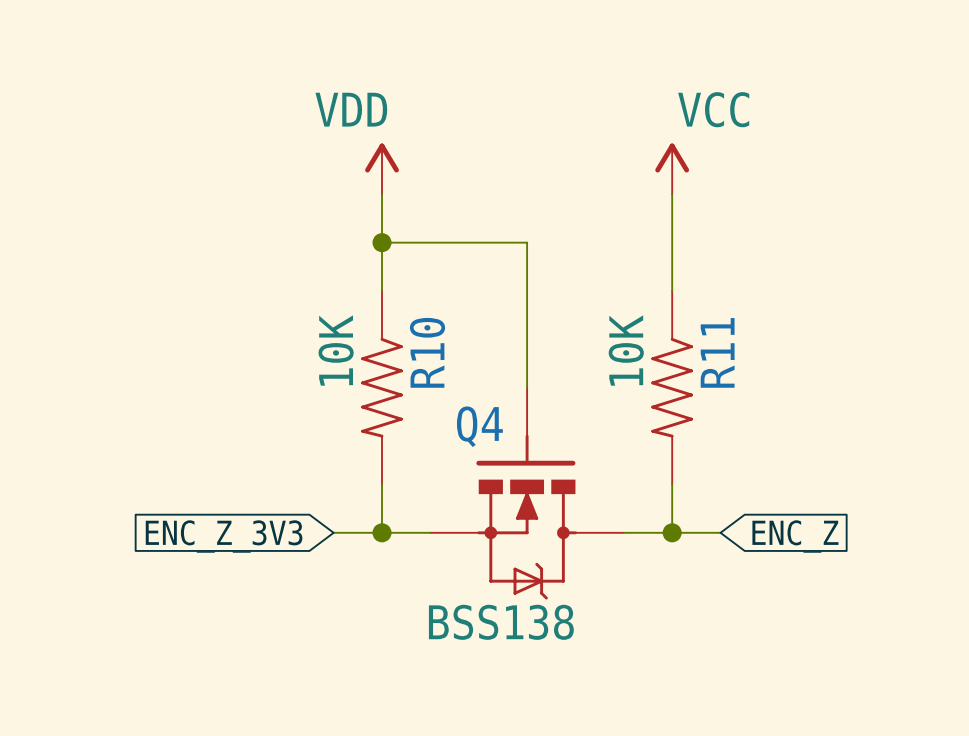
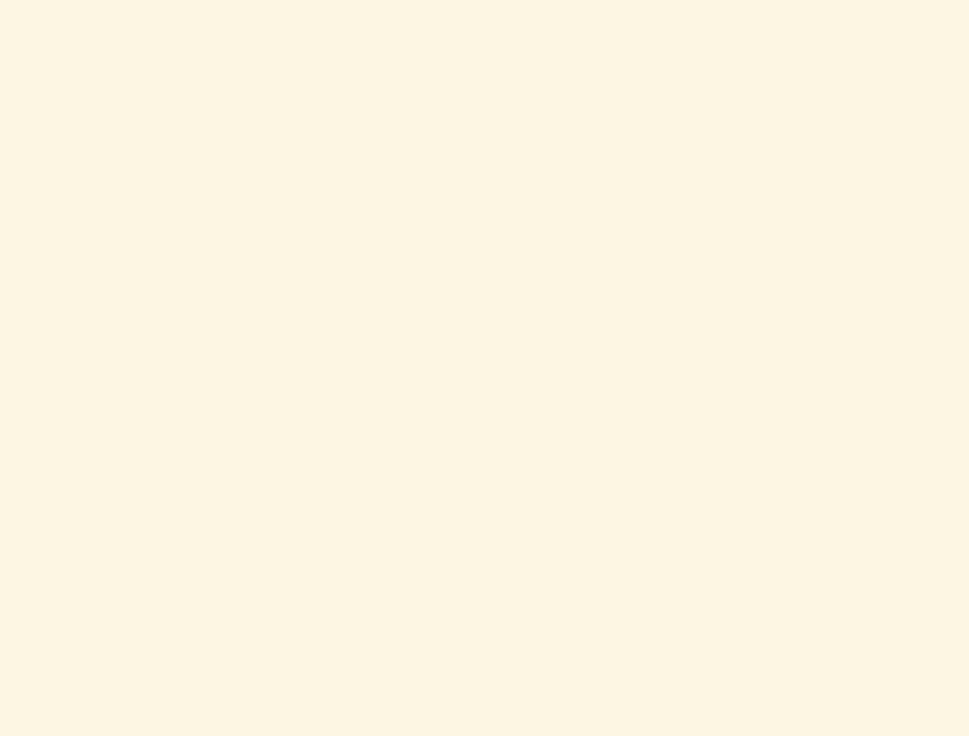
power symbol: VDD (382, 168) -> none
power symbol: VCC (672, 168) -> none
wire: (382, 194) (382, 291) -> none
wire: (672, 194) (672, 291) -> none
wire: (382, 242) (527, 242) (527, 387) -> none
junction: (382, 242) -> none
R10: 10K (382, 387) -> none
R11: 10K (672, 387) -> none
wire: (382, 484) (382, 532) -> none
wire: (672, 484) (672, 532) -> none
Q4: BSS138 (527, 493) -> none
wire: (333, 532) (430, 532) -> none
junction: (382, 532) -> none
wire: (623, 532) (720, 532) -> none
junction: (672, 532) -> none
global label: ENC_Z_3V3 (224, 536) -> none
global label: ENC_Z (795, 536) -> none

